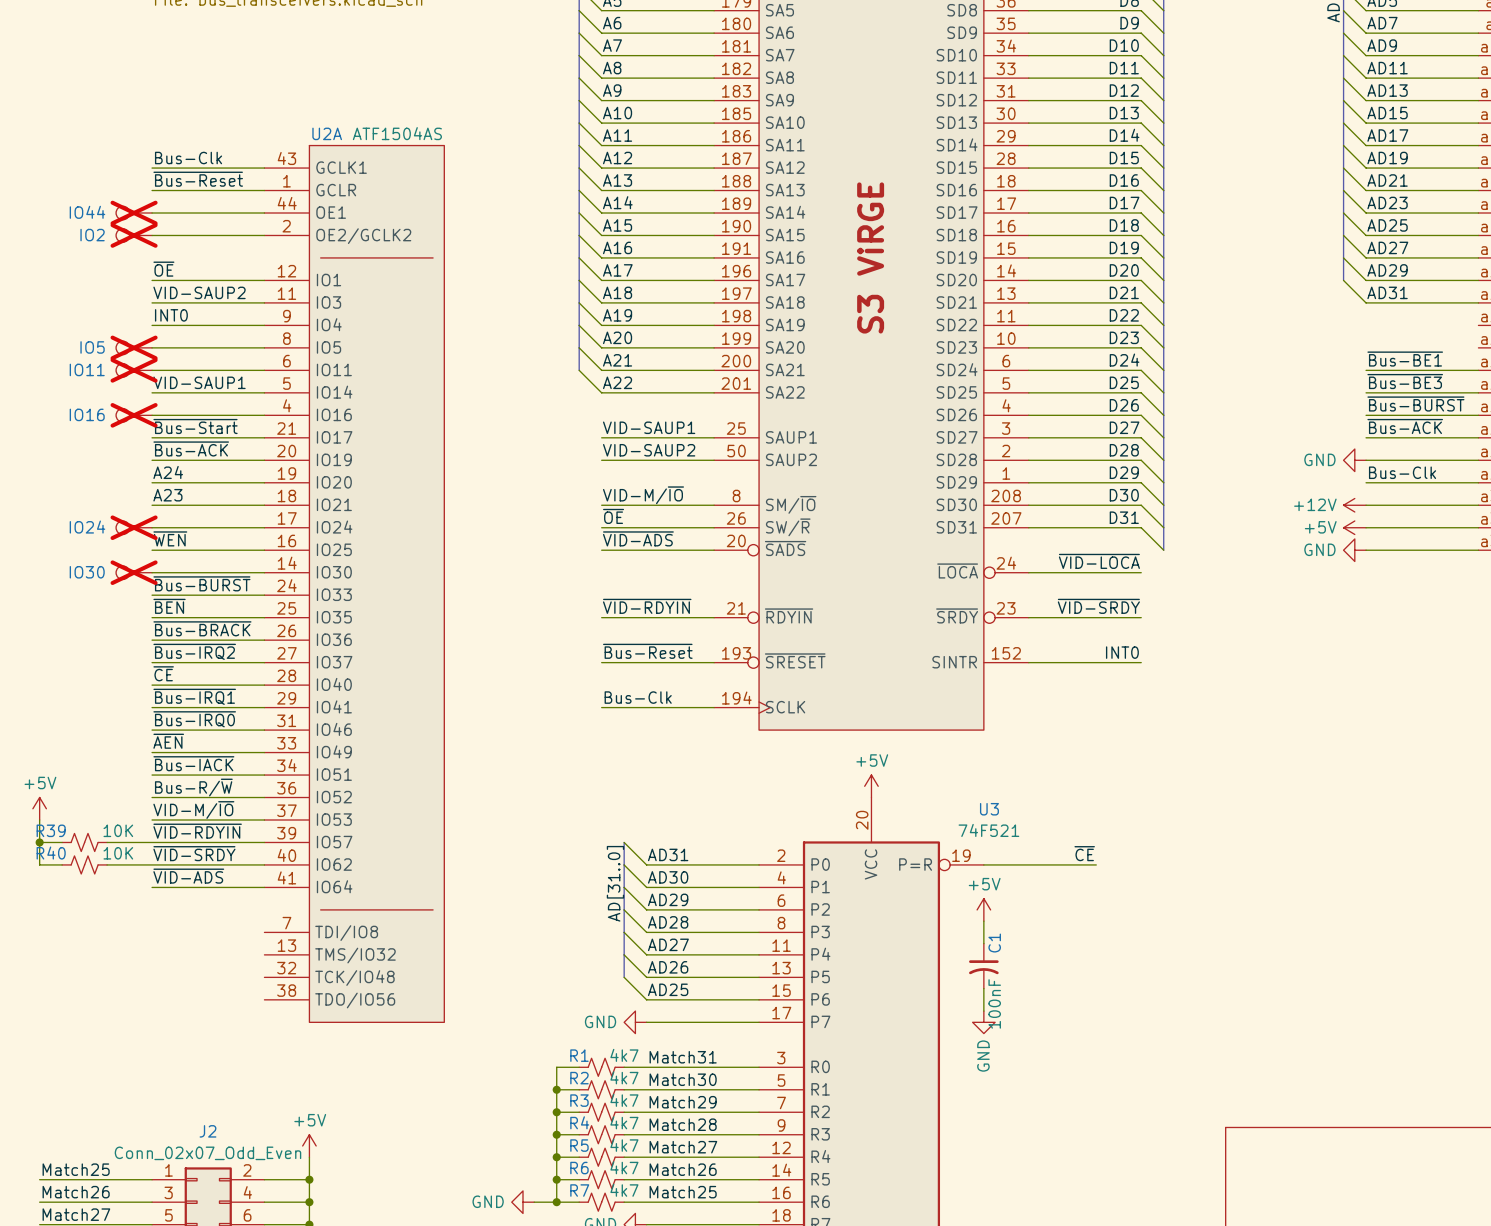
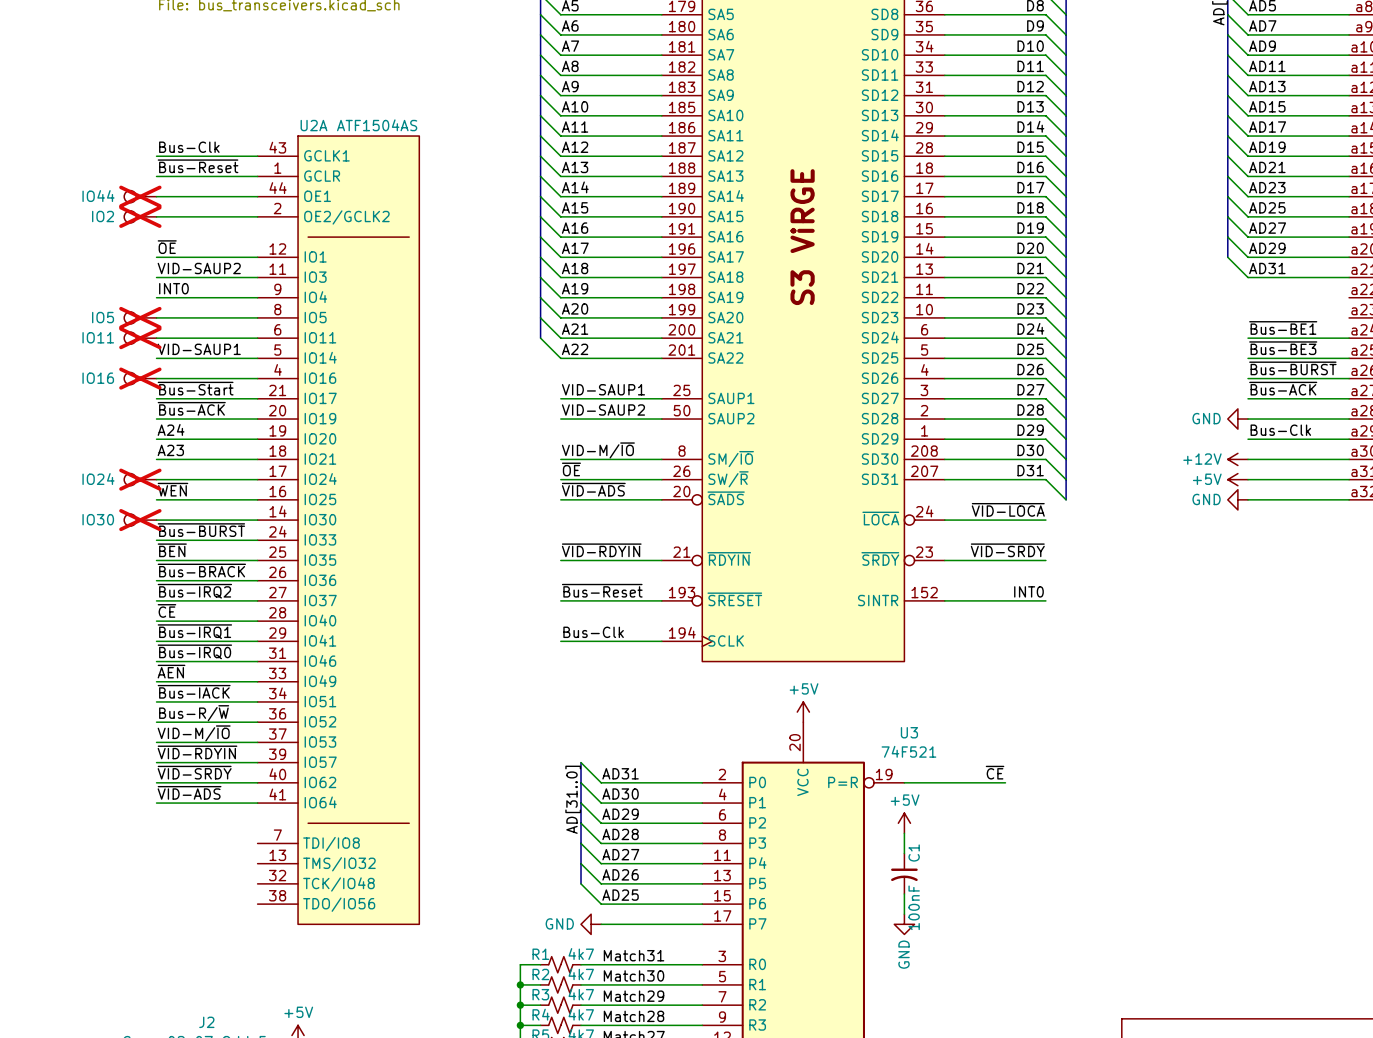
power symbol: +5V (39, 808) -> none
wire: (39, 820) (39, 864) (62, 864) -> none
wire: (39, 842) (62, 842) -> none
junction: (39, 842) -> none
R39: 10K (84, 842) -> none
wire: (107, 842) (152, 842) -> none
R40: 10K (84, 864) -> none
wire: (107, 864) (152, 864) -> none

